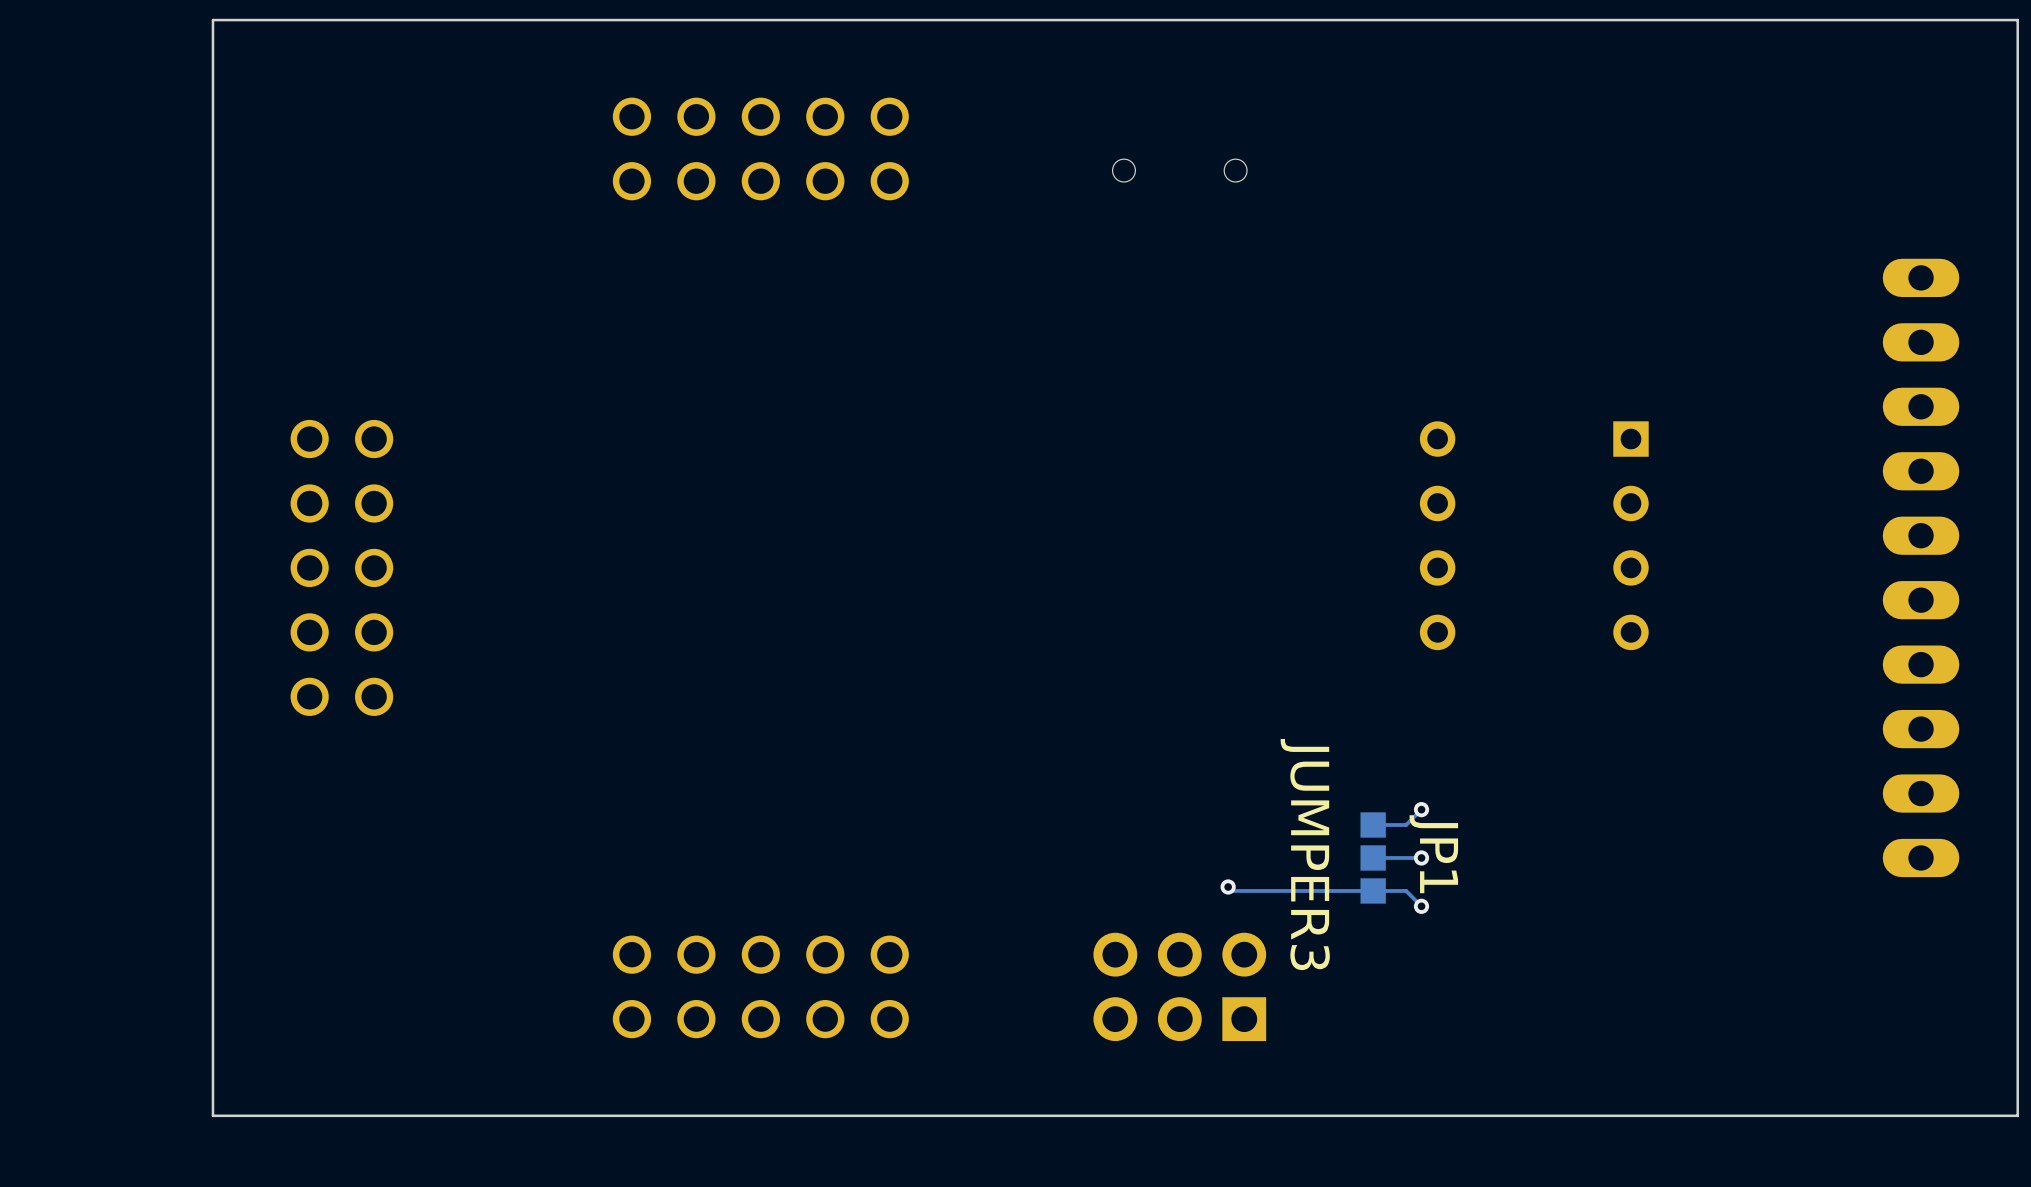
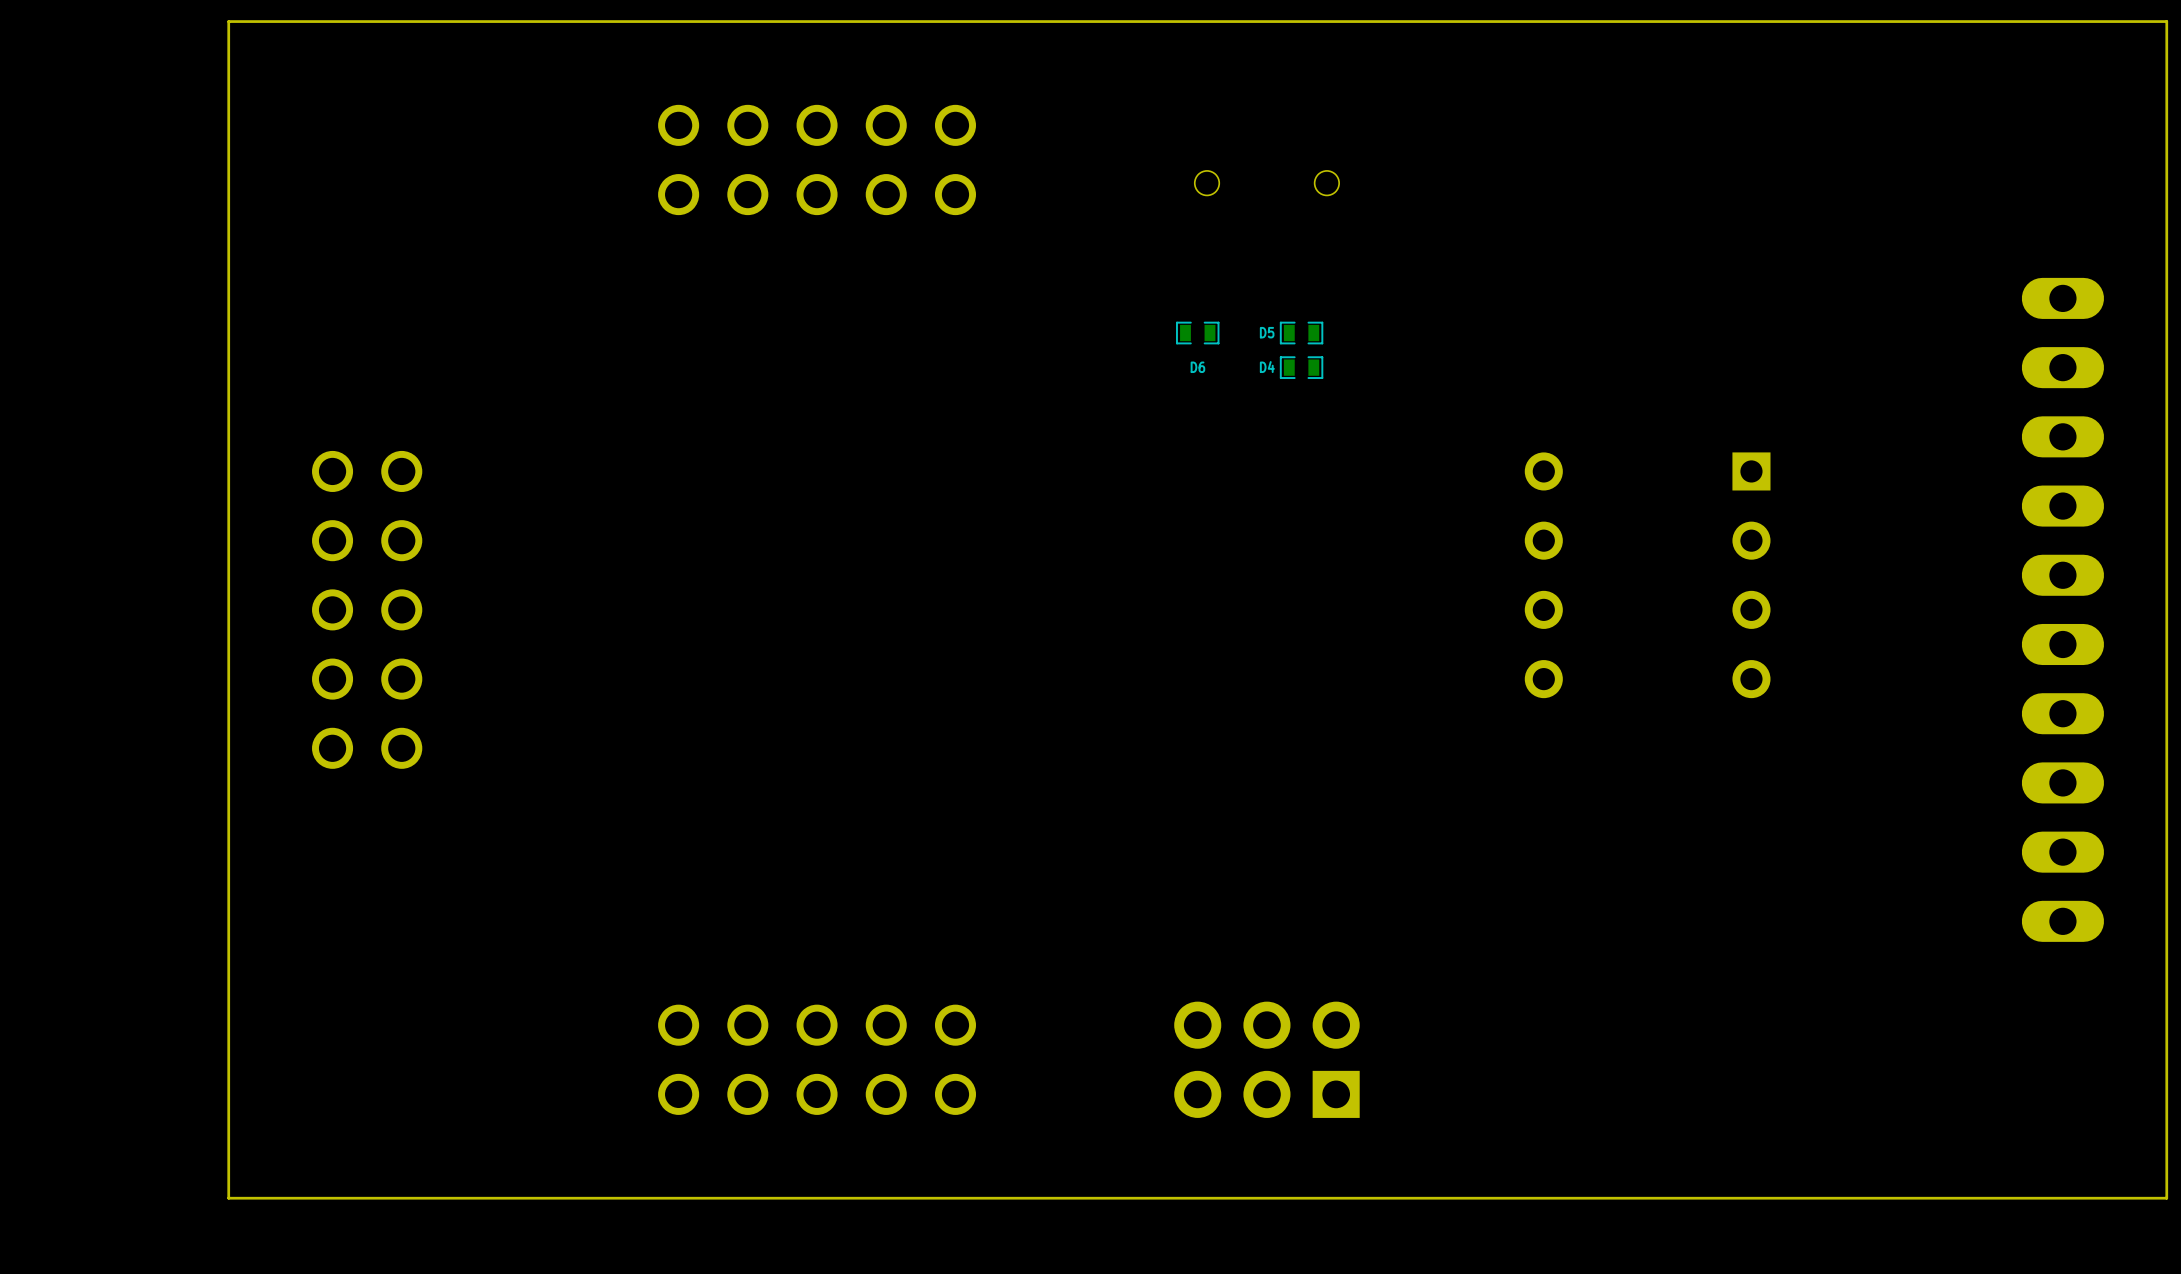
D6: none -> (1197, 333)
D5: none -> (1301, 333)
D4: none -> (1301, 367)
track: (1421, 809) (1406, 824) (1373, 824) -> none
via: (1421, 809) -> none
JP1: JUMPER3 (1373, 857) -> none
track: (1421, 857) (1373, 857) -> none
via: (1421, 857) -> none
track: (1228, 886) (1232, 890) (1406, 890) (1421, 906) -> none
via: (1228, 886) -> none
via: (1421, 906) -> none

